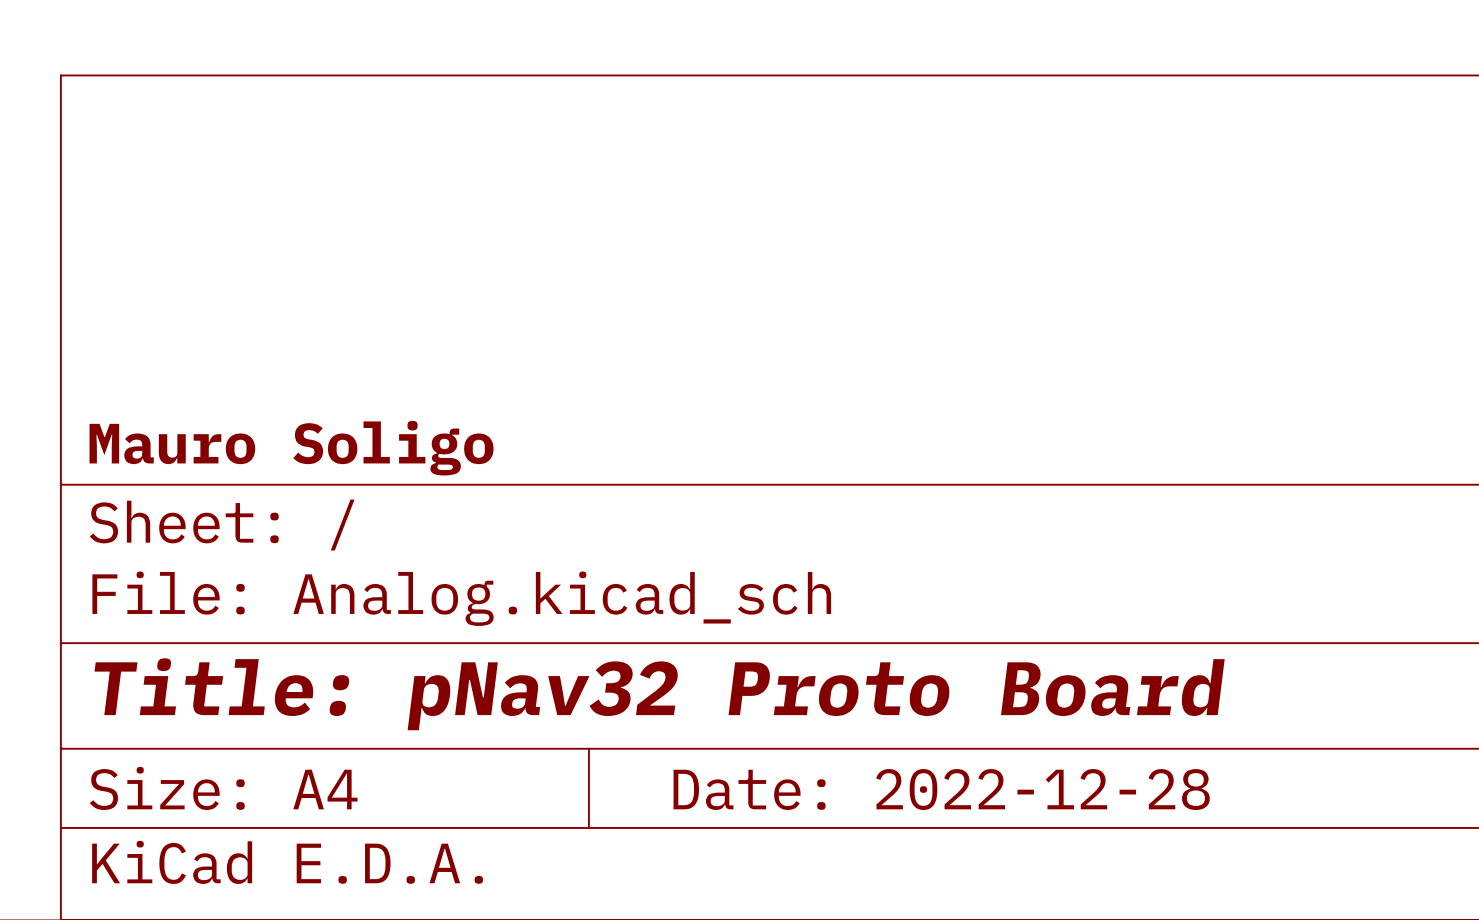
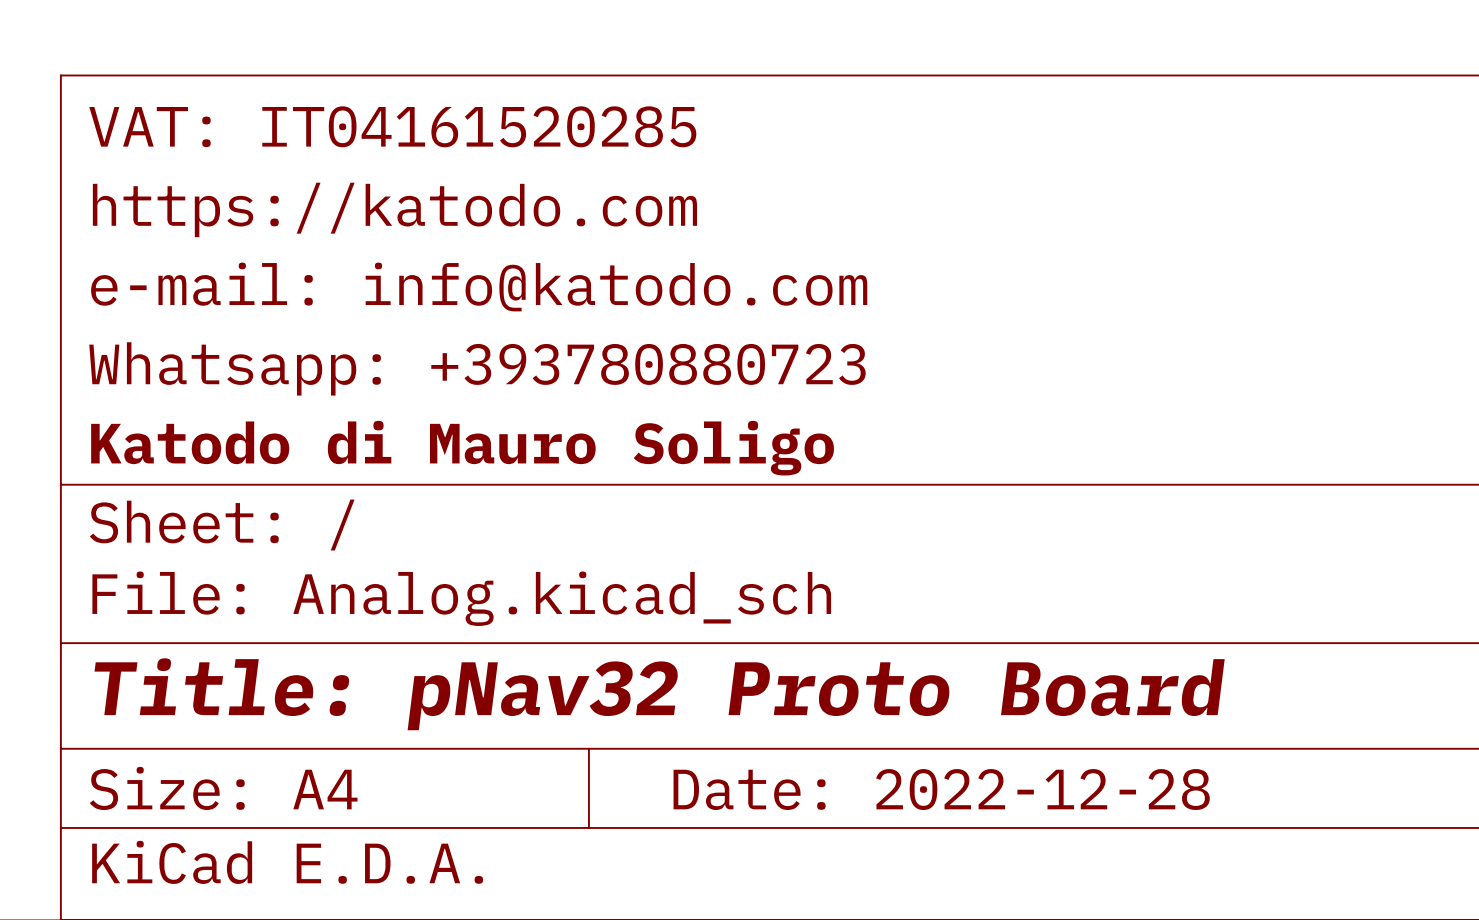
title block: none -> VAT: IT04161520285 (392, 126)
title block: none -> https://katodo.com (394, 209)
title block: none -> e-mail: info@katodo.com (479, 286)
title block: none -> Whatsapp: +393780880723 (477, 368)
title block: Mauro Soligo (291, 448) -> Katodo di Mauro Soligo (462, 448)

